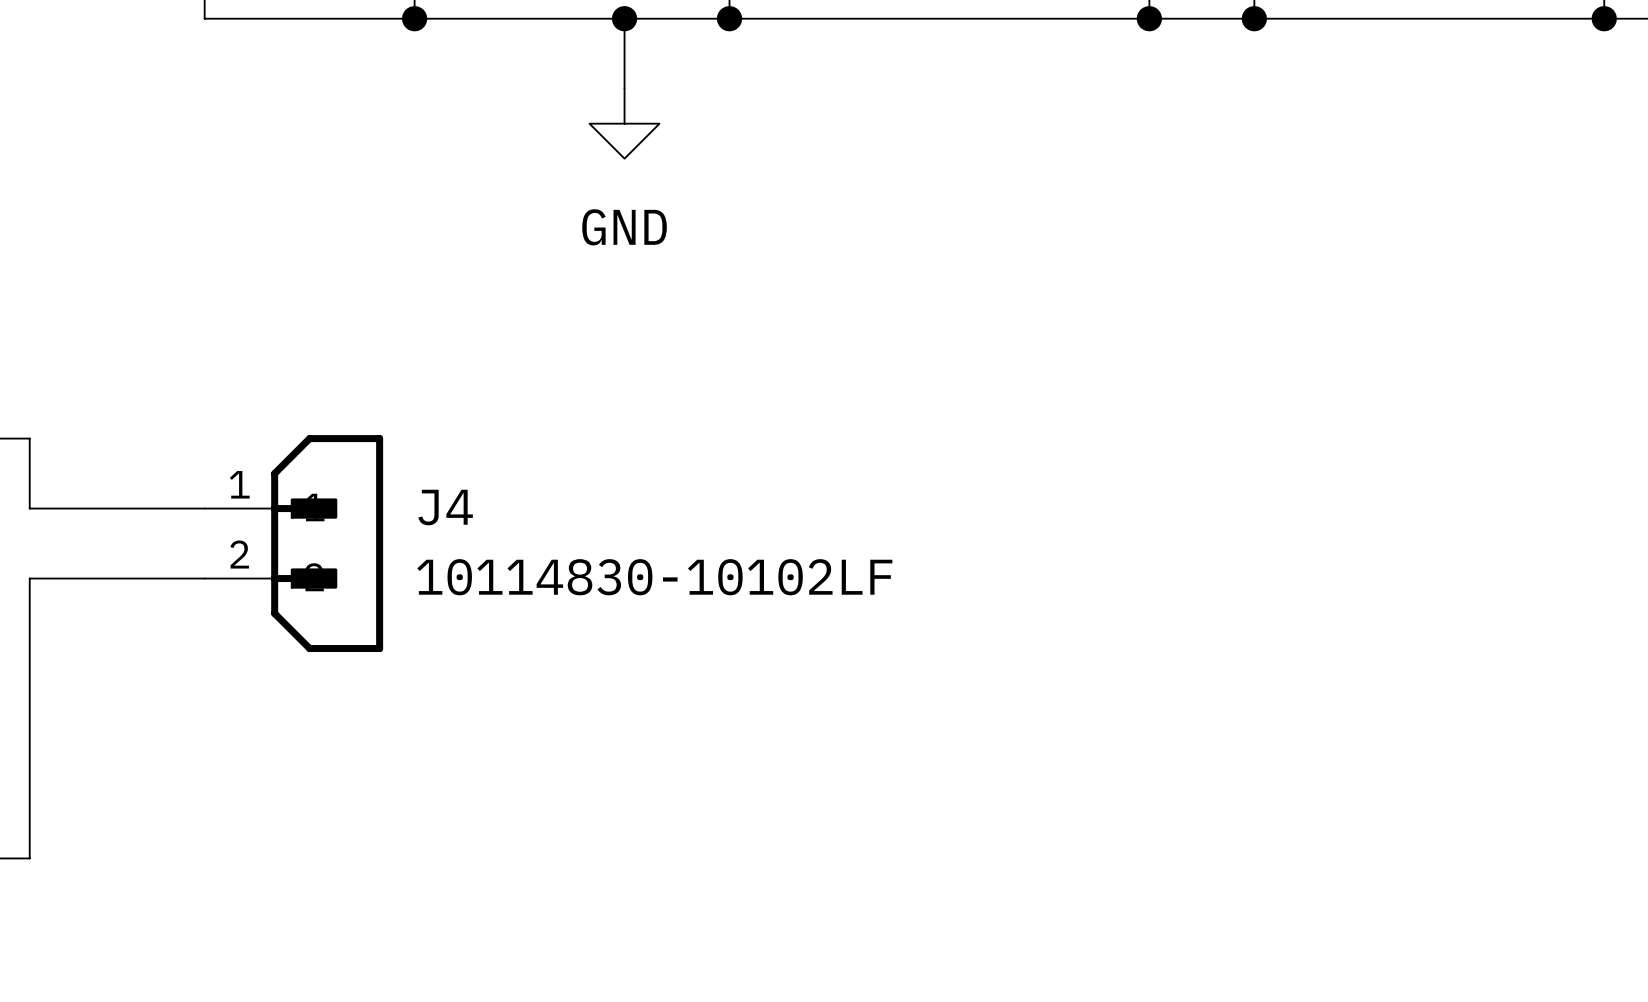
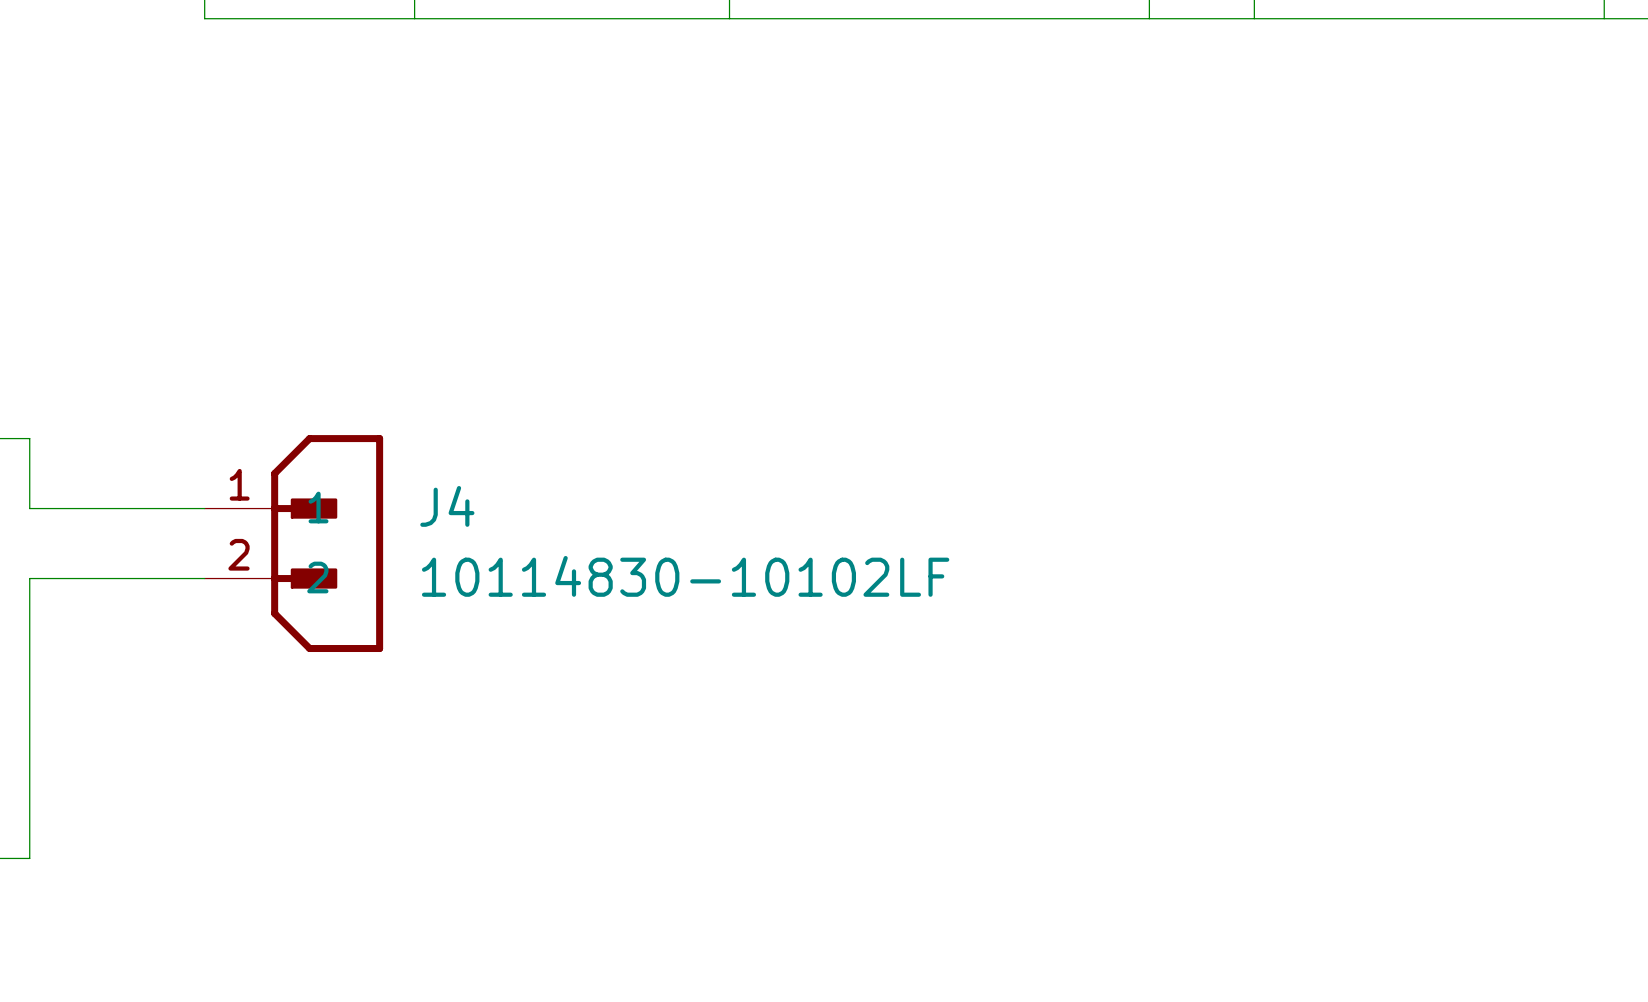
junction: (414, 18) -> none
wire: (624, 18) (624, 88) -> none
junction: (624, 18) -> none
junction: (729, 18) -> none
junction: (1149, 18) -> none
junction: (1254, 18) -> none
junction: (1604, 18) -> none
power symbol: GND (624, 123) -> none

